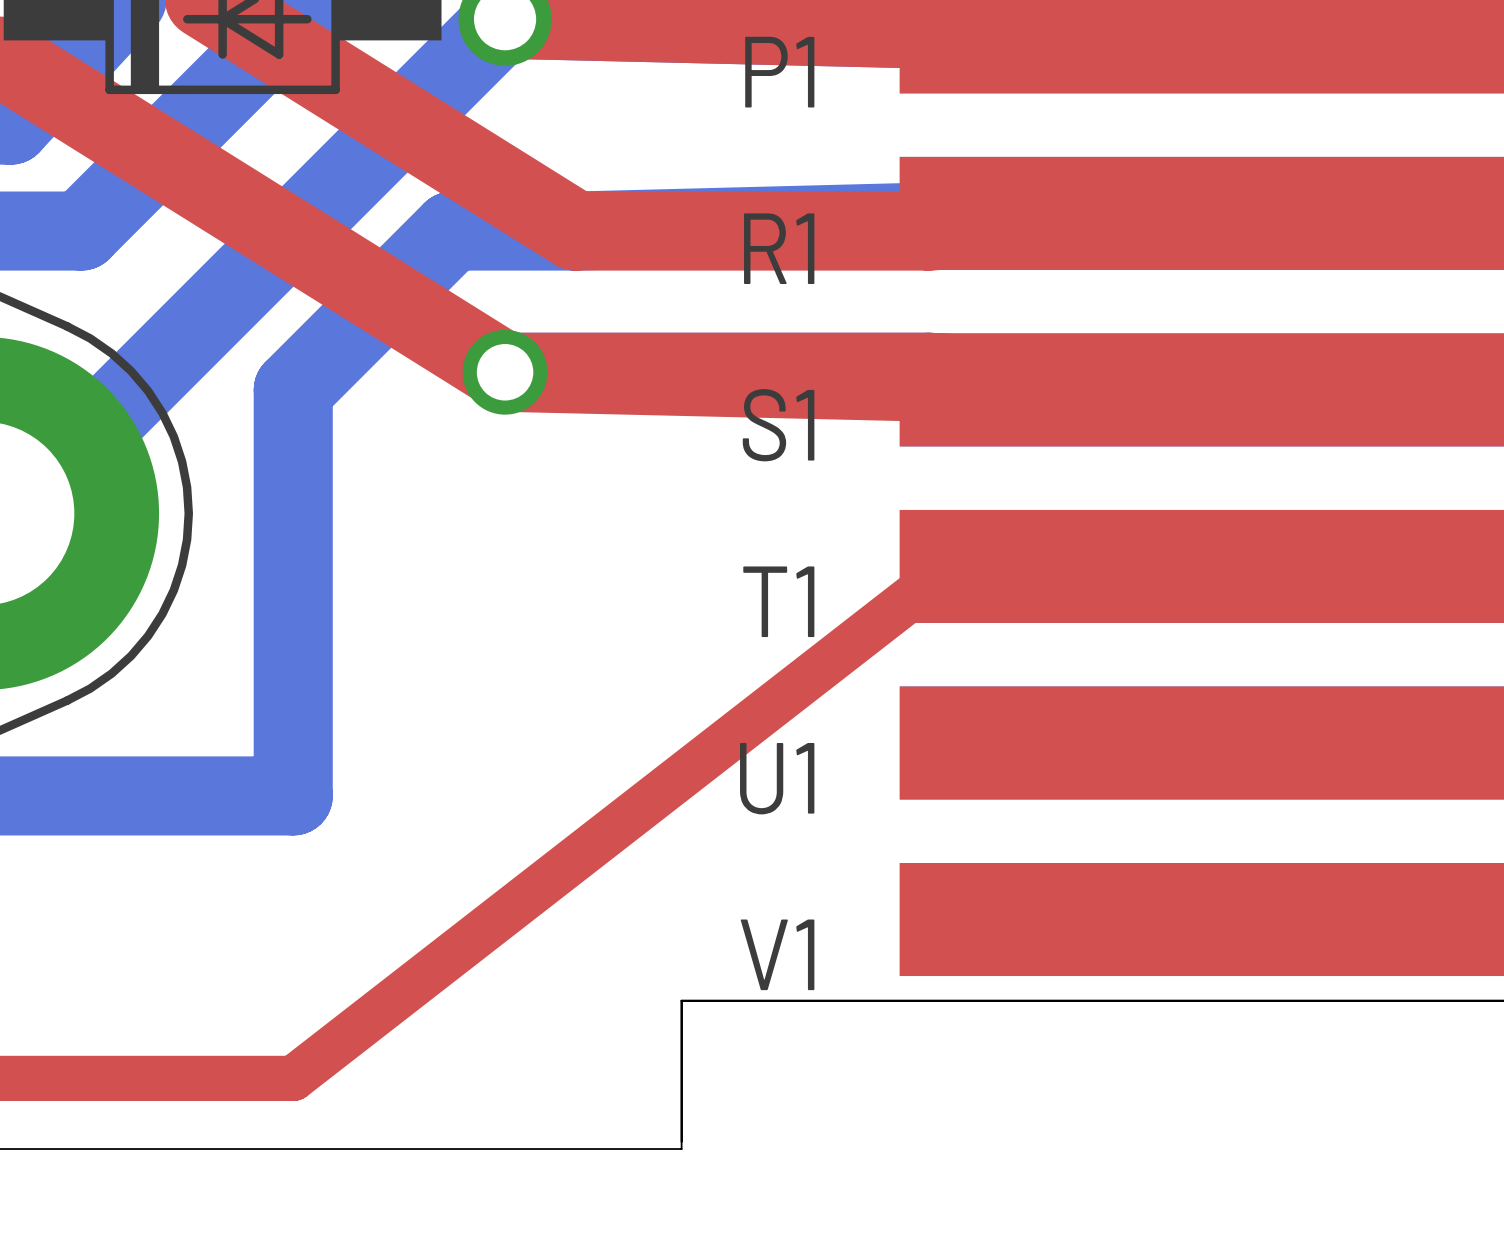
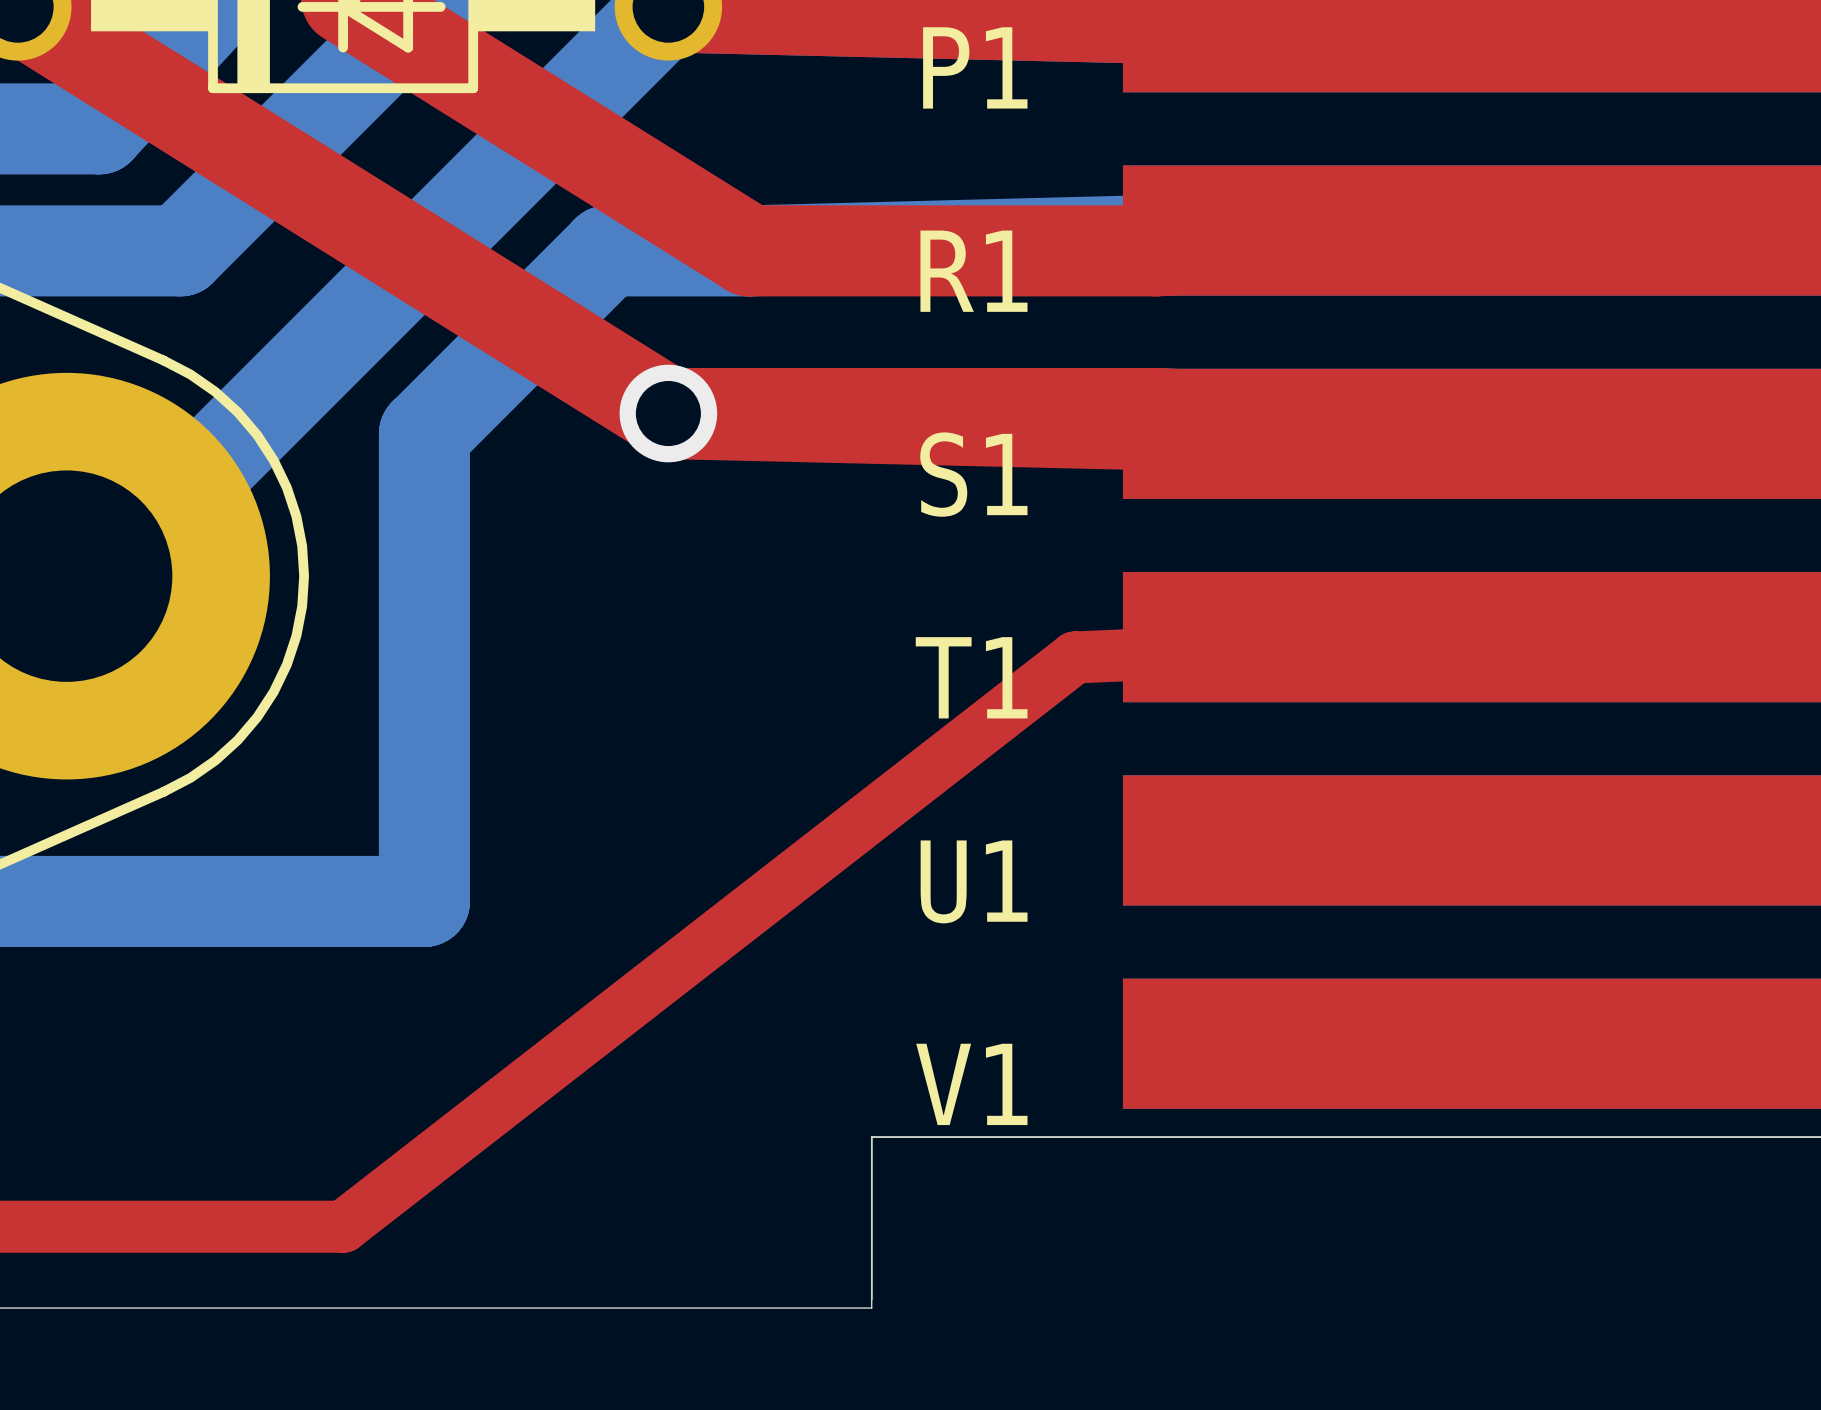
top track: (1264, 566) (928, 584) (293, 1078) (222, 1078) -> (1542, 637) (1074, 657) (343, 1226)

